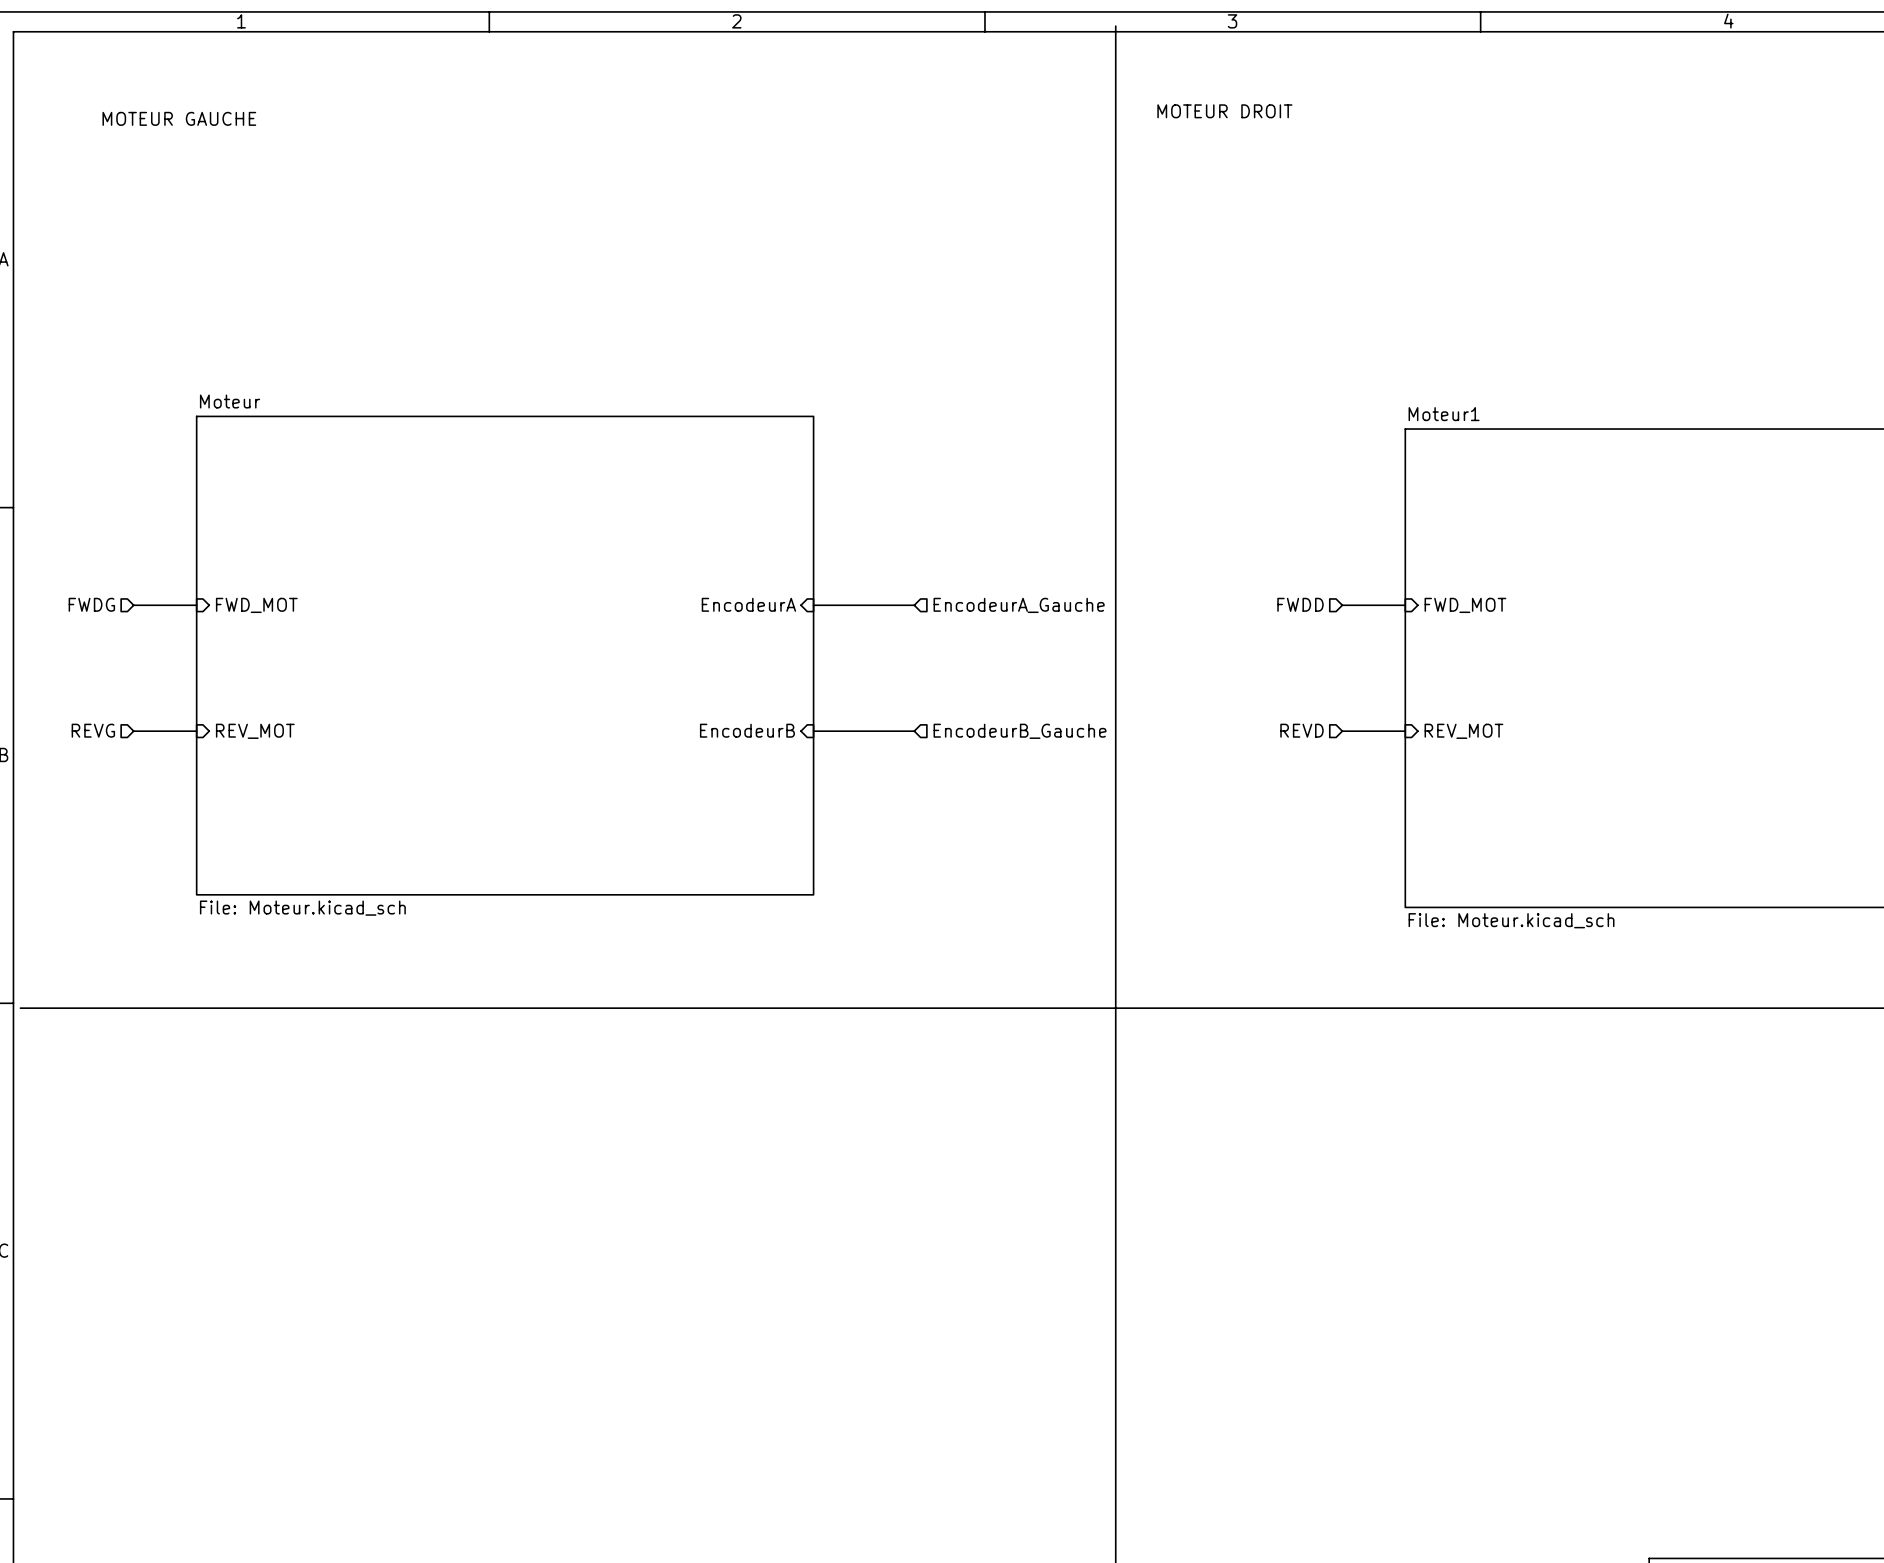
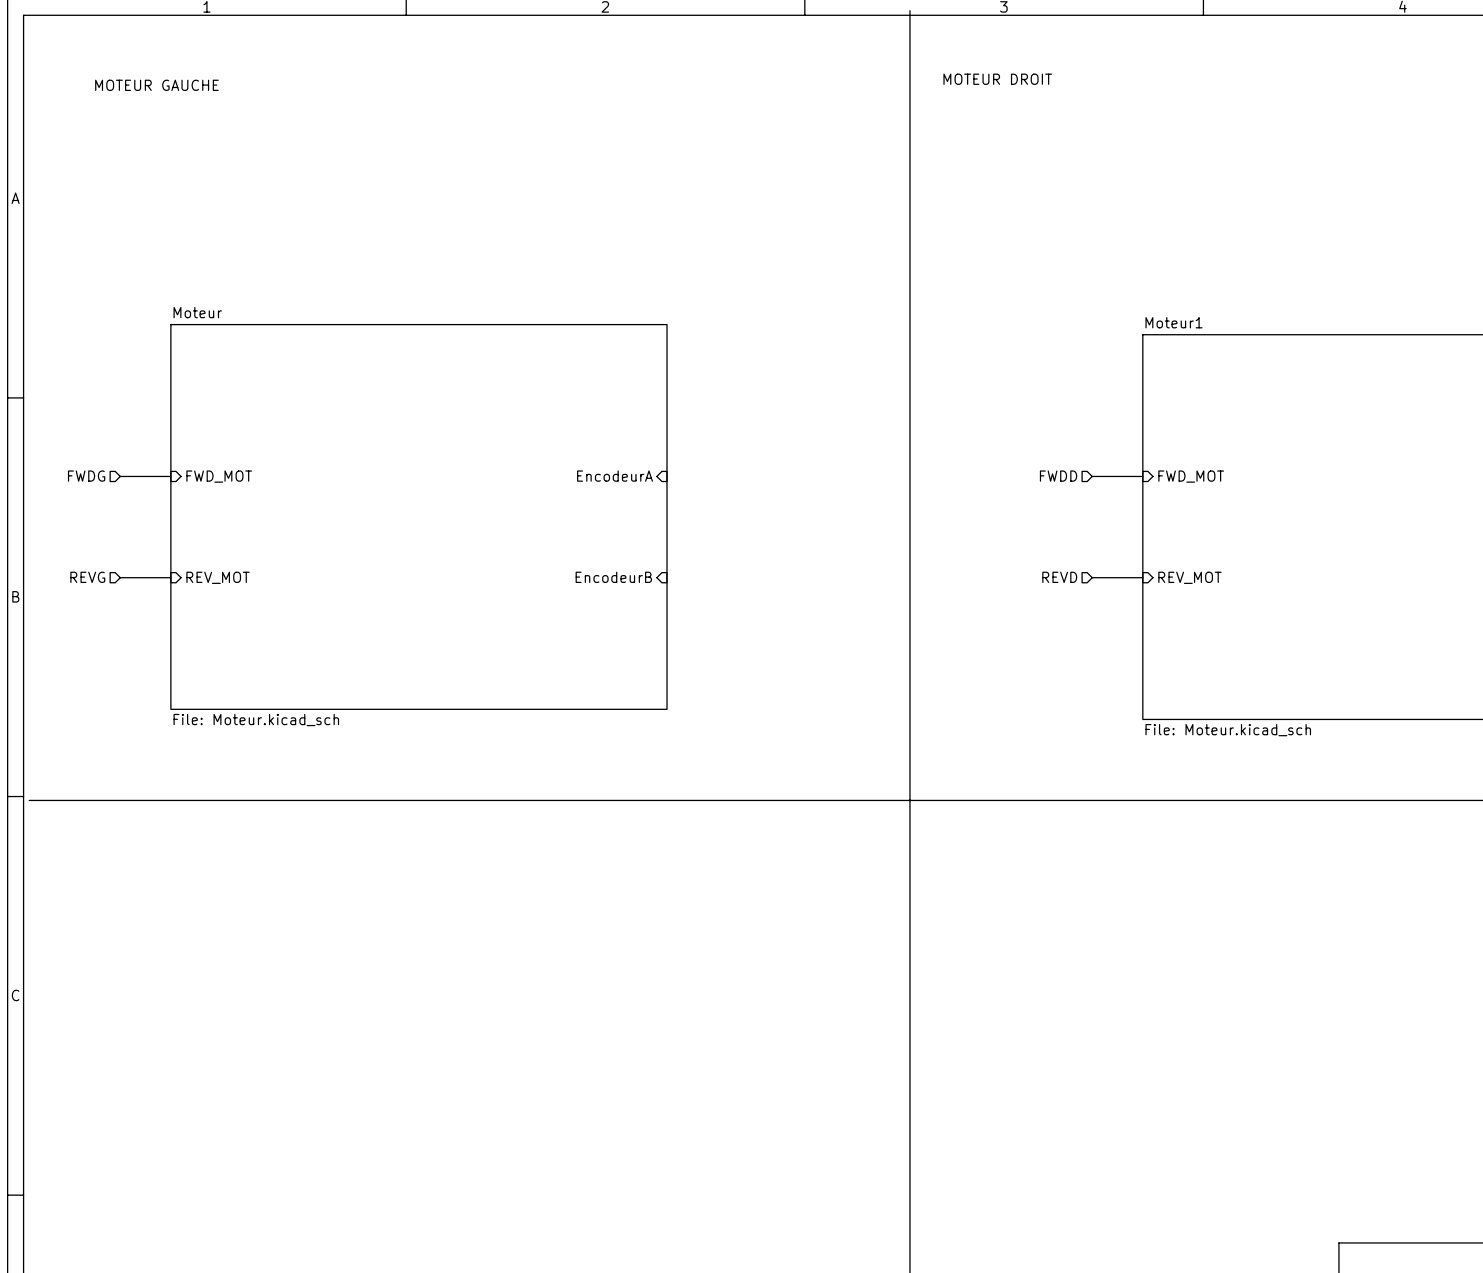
wire: (813, 605) (914, 605) -> none
hierarchical label: EncodeurA_Gauche (1019, 605) -> none
wire: (813, 731) (914, 731) -> none
hierarchical label: EncodeurB_Gauche (1020, 731) -> none

